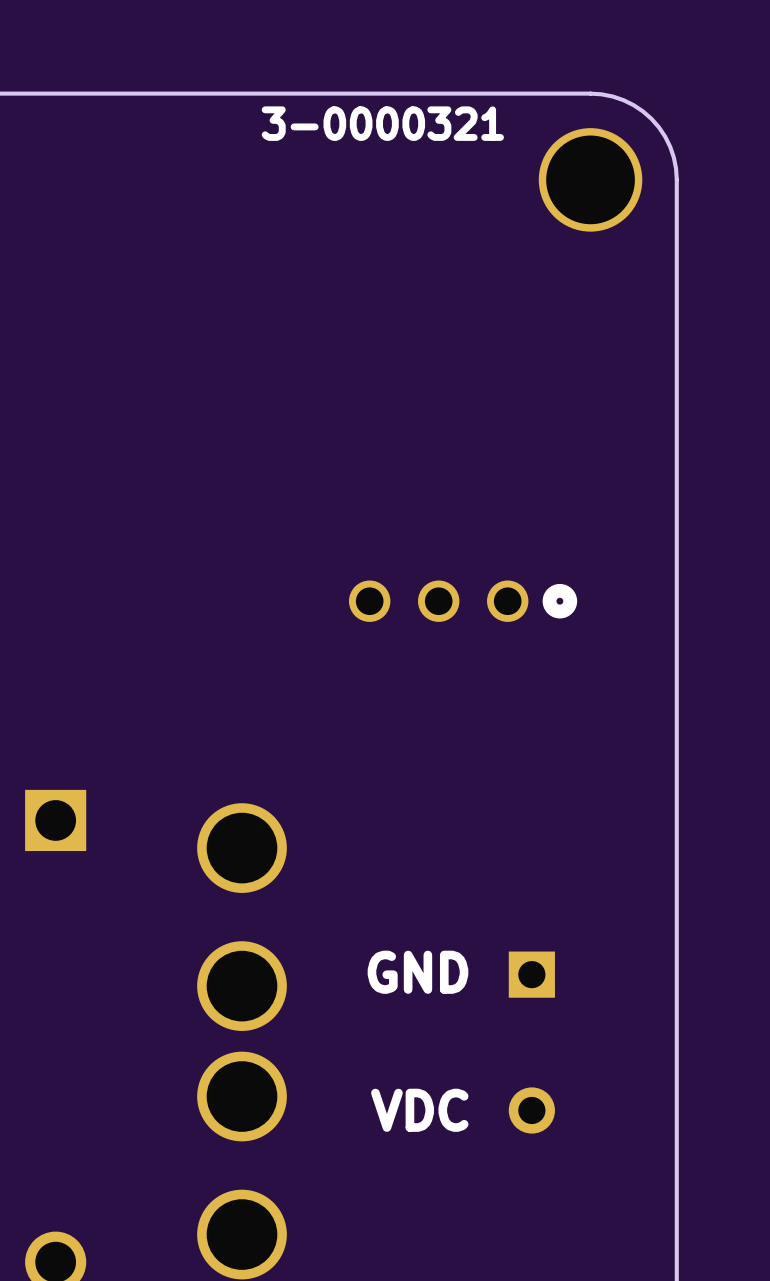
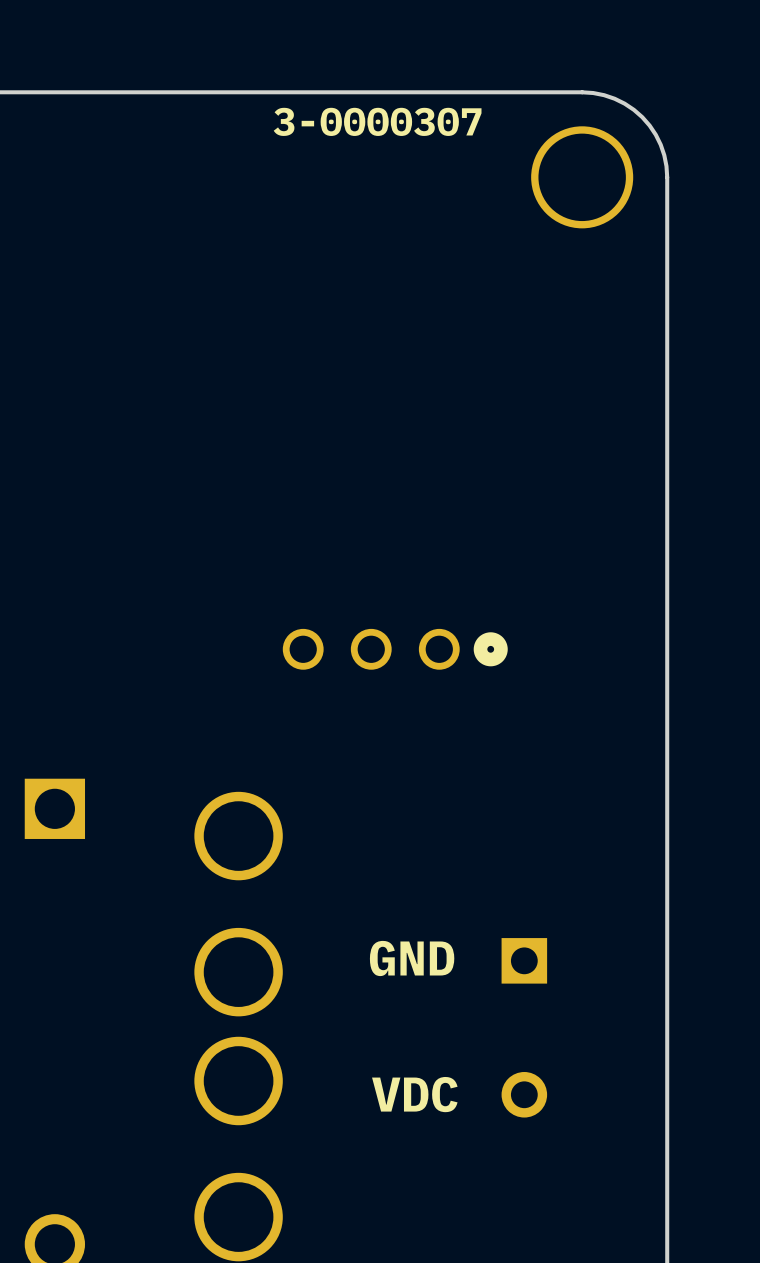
text: 3-0000321 (382, 123) -> 3-0000307 (377, 121)
part position: (463, 601) -> (395, 649)

